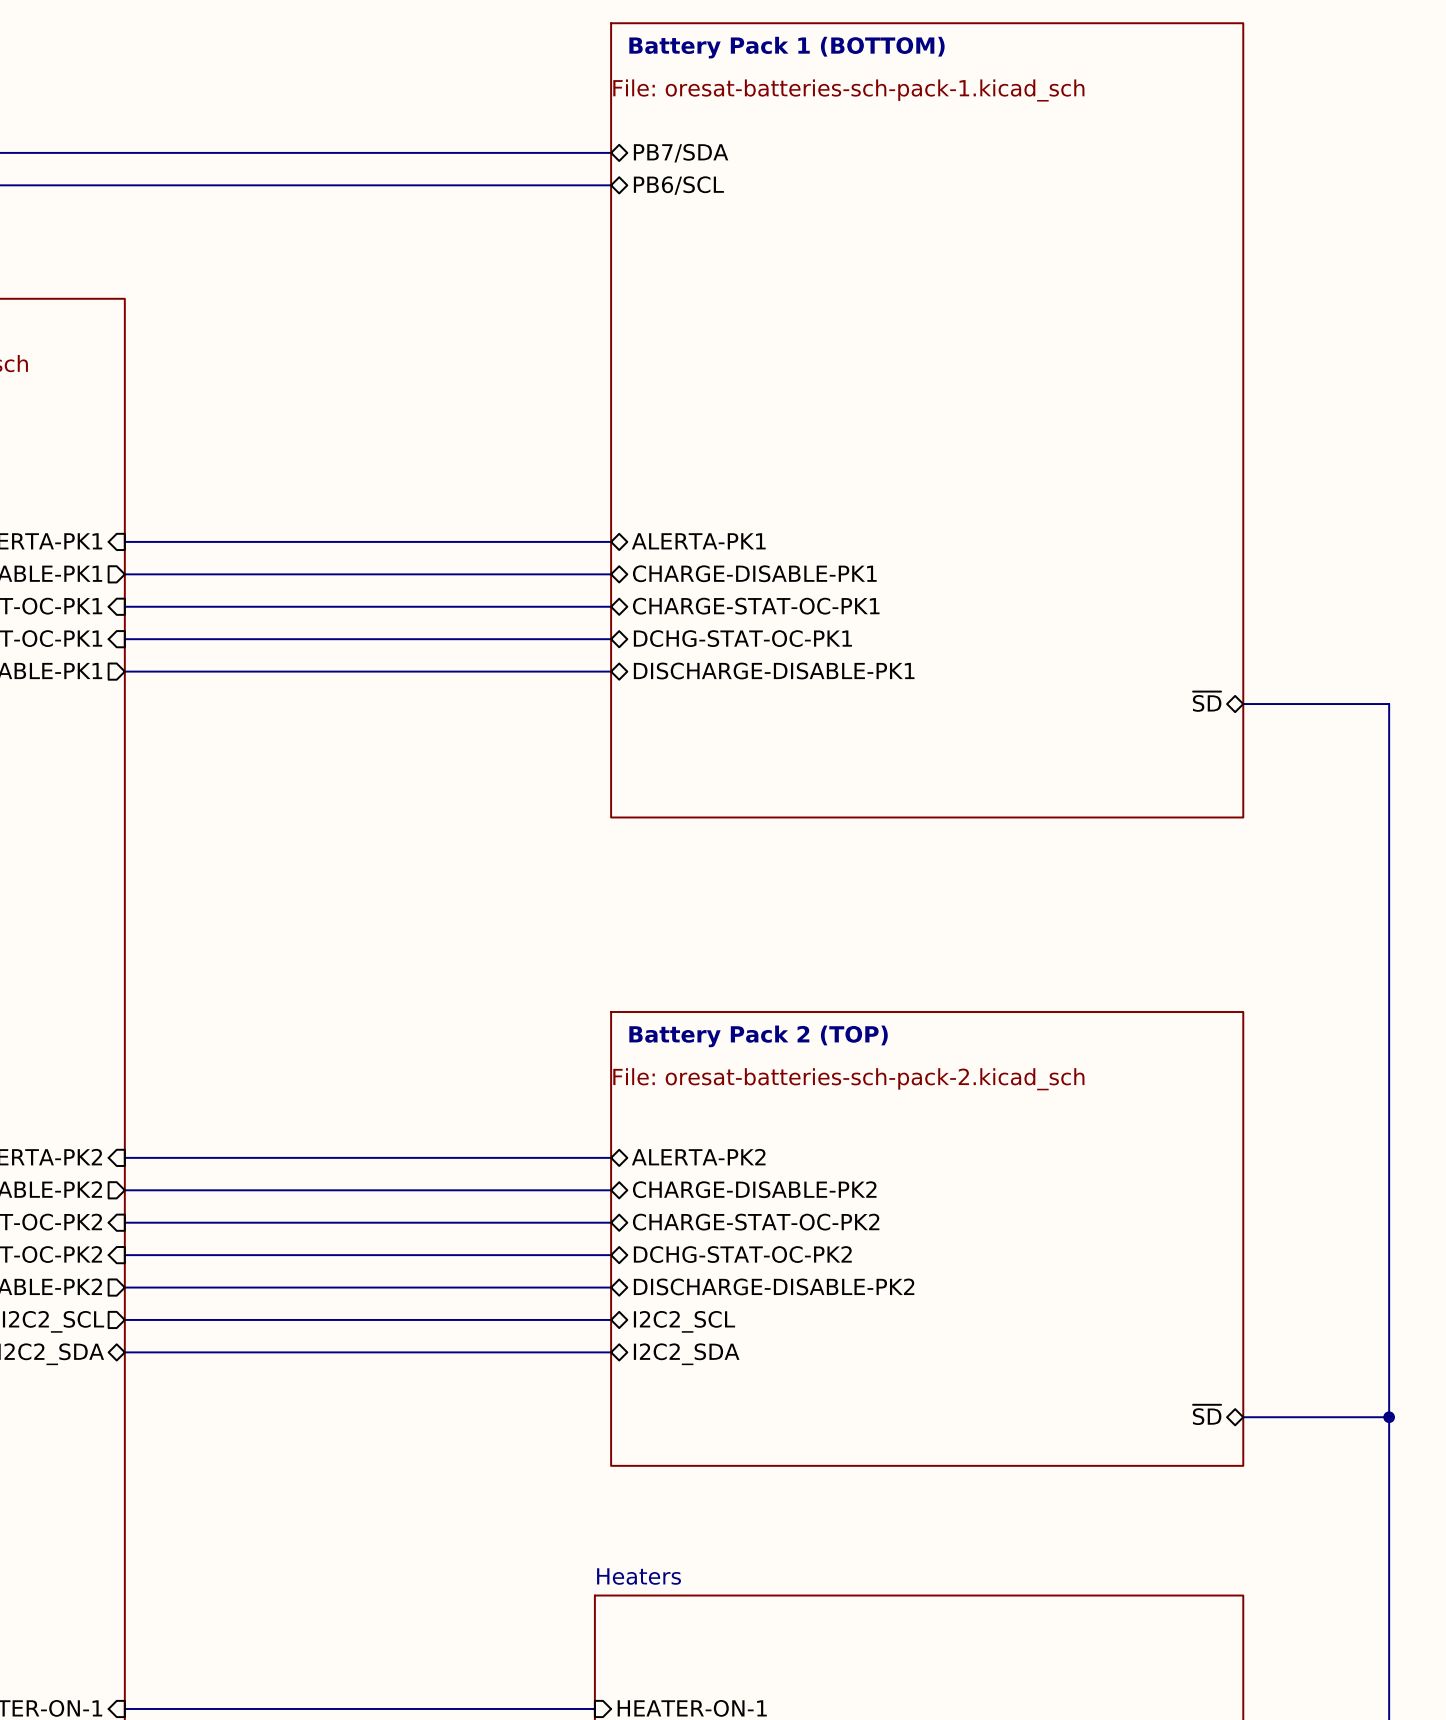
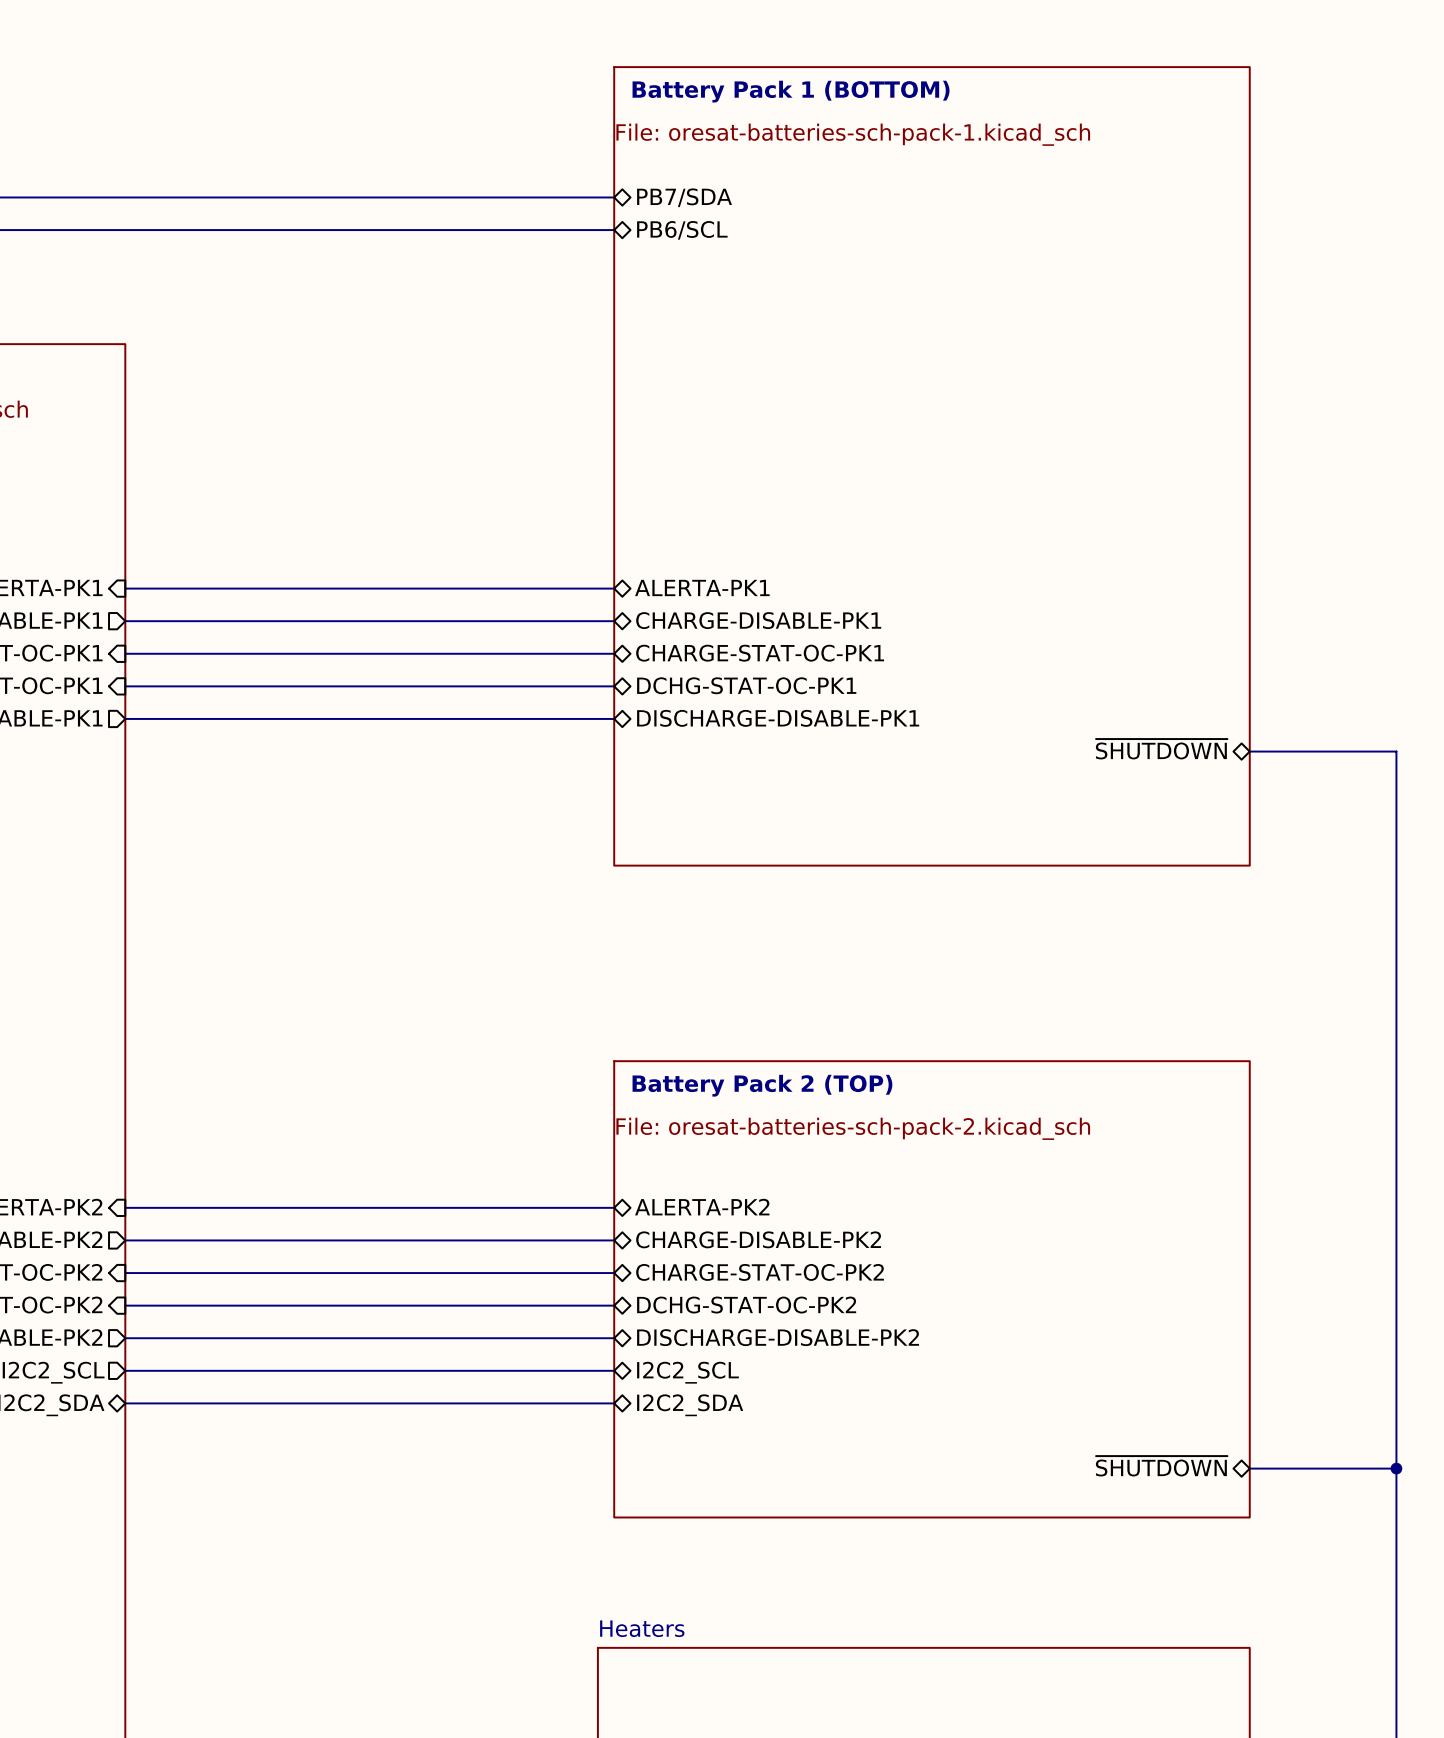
sheet pin: ~{SD} (1207, 701) -> ~{SHUTDOWN} (1161, 749)
sheet pin: ~{SD} (1207, 1414) -> ~{SHUTDOWN} (1161, 1466)

